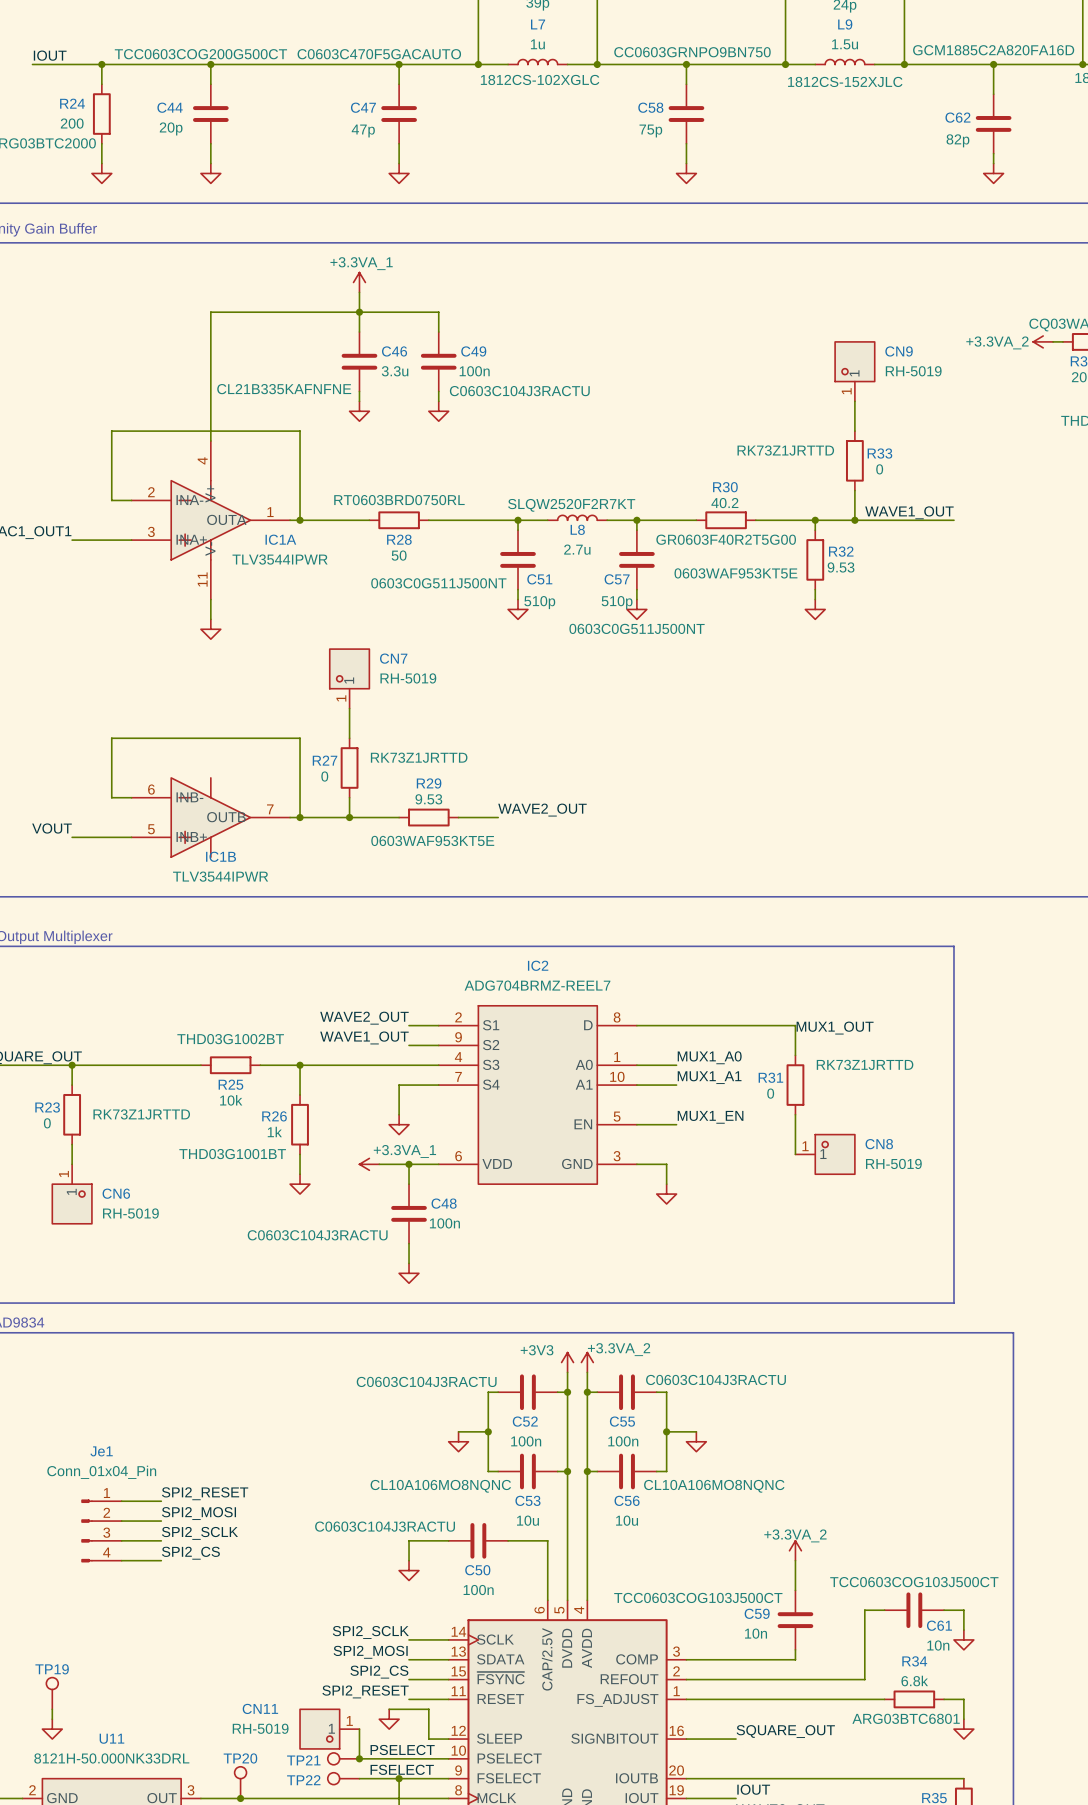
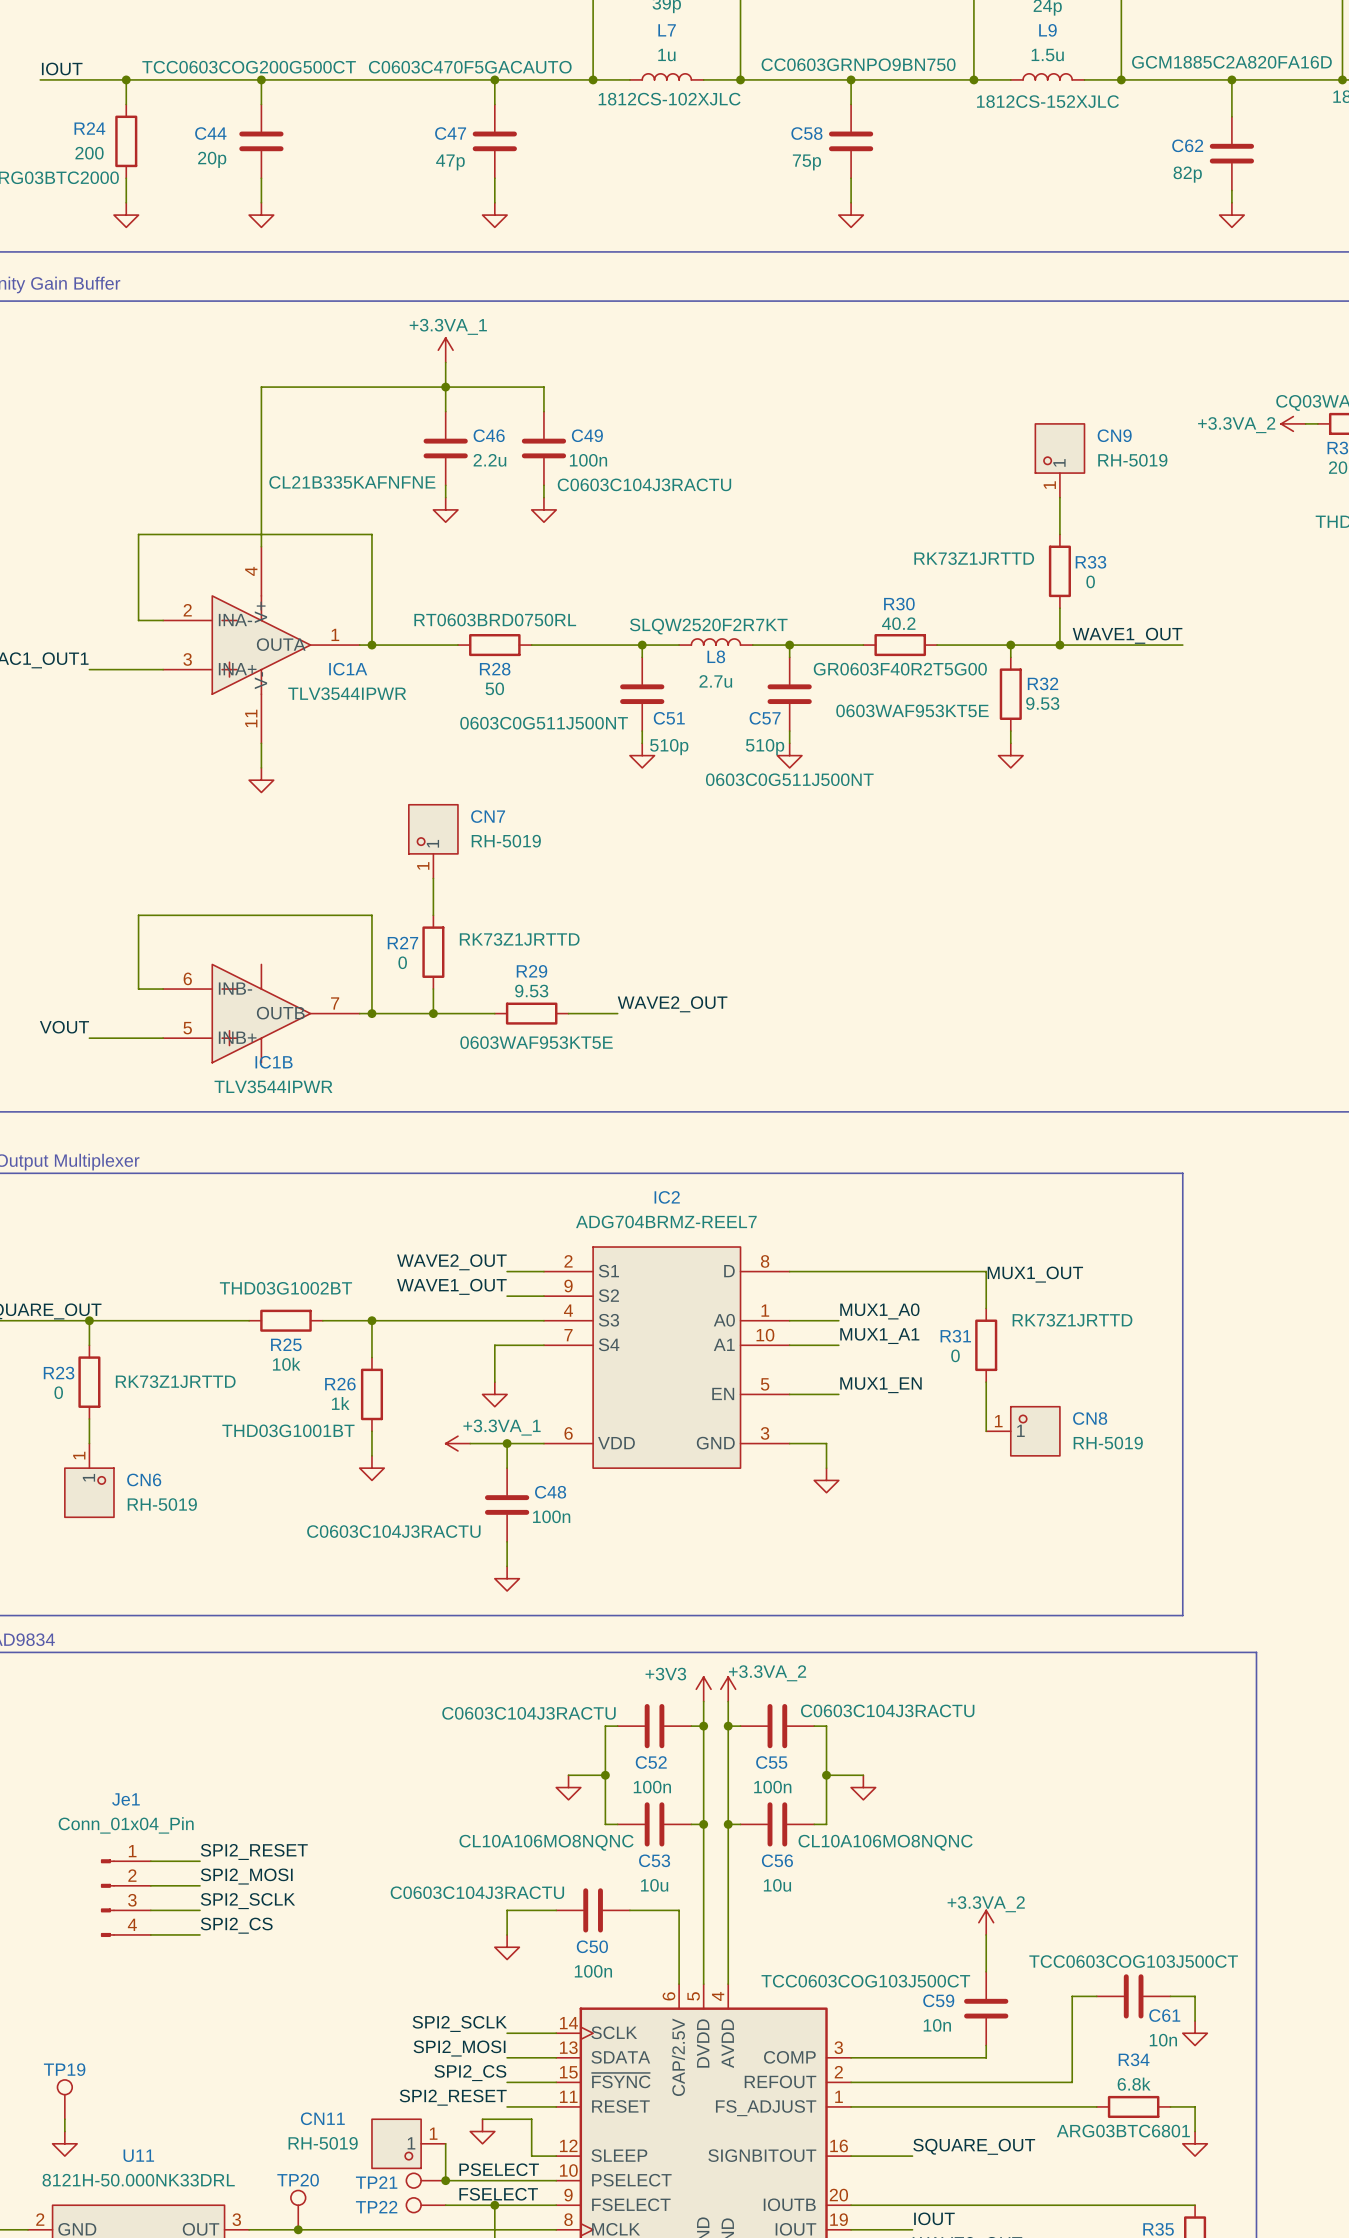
L7 text: 1812CS-102XGLC (540, 79) -> 1812CS-102XJLC (669, 99)
C46 value: 3.3u (395, 371) -> 2.2u (489, 460)

